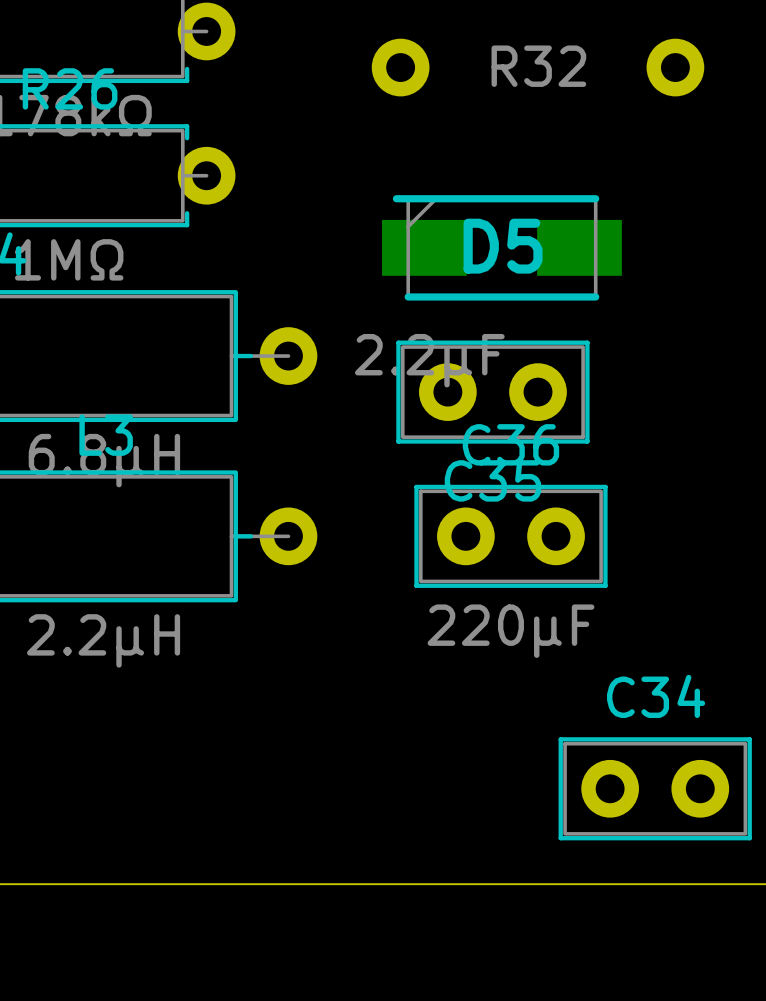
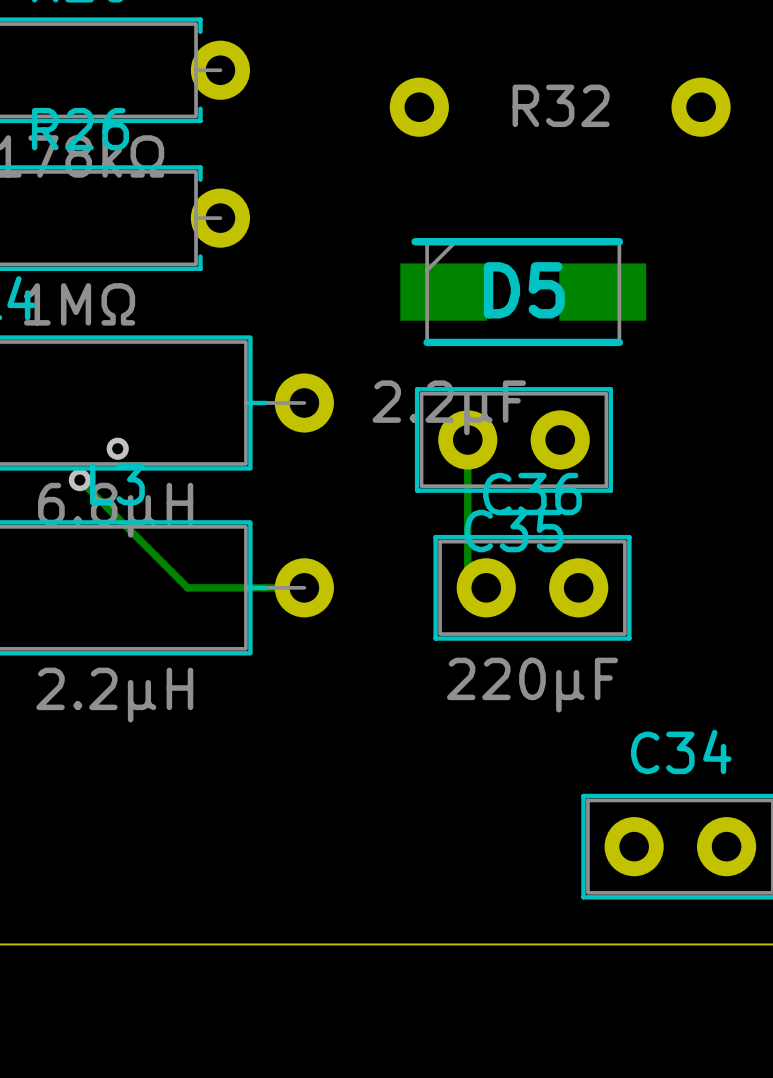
track: none -> (467, 439) (467, 569) (486, 587)
via: none -> (117, 448)
track: none -> (79, 480) (187, 587) (304, 587)
via: none -> (79, 480)

